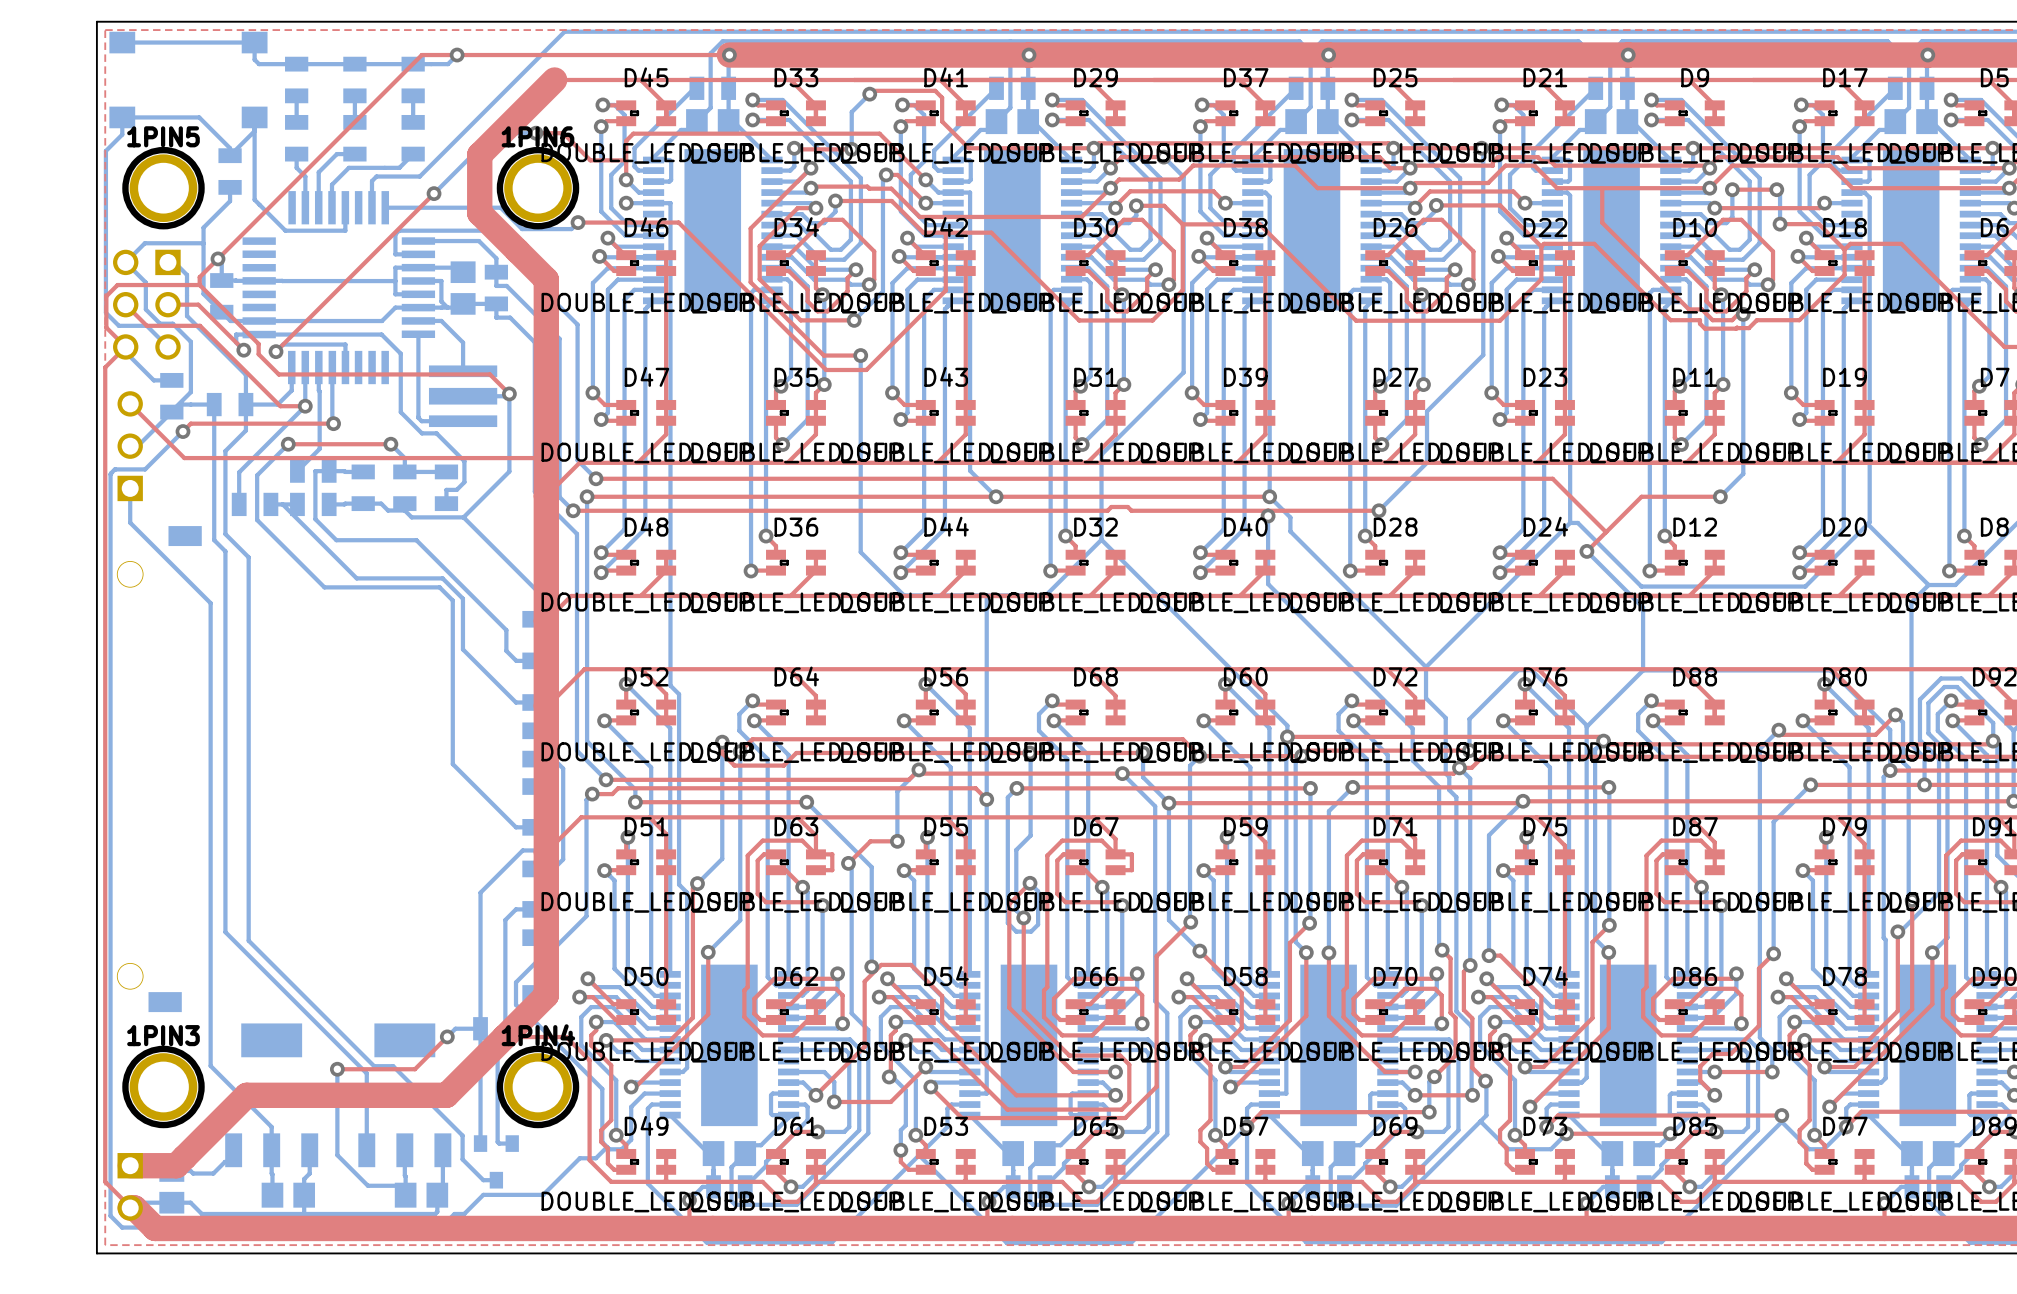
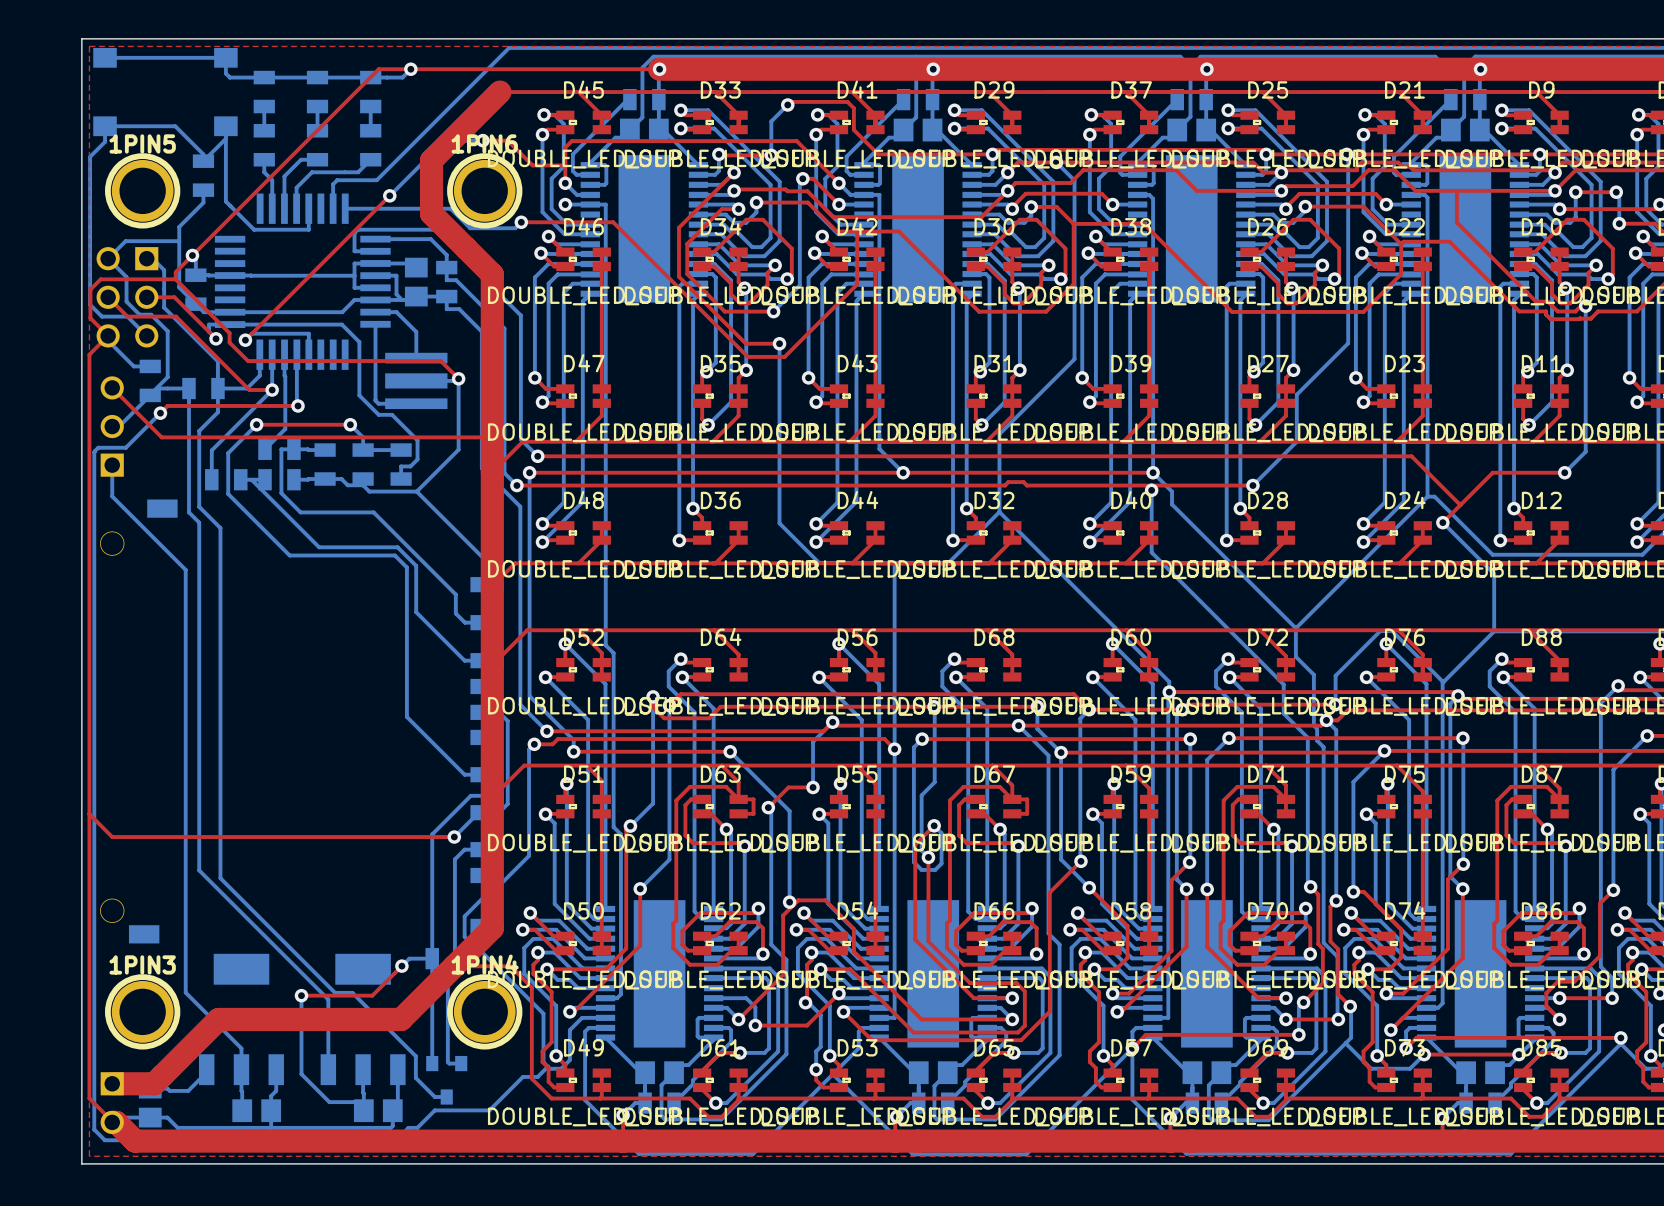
bottom track: none -> (481, 812) (478, 812) (454, 837)
top track: none -> (89, 814) (112, 837) (454, 837)
via: none -> (454, 837)

